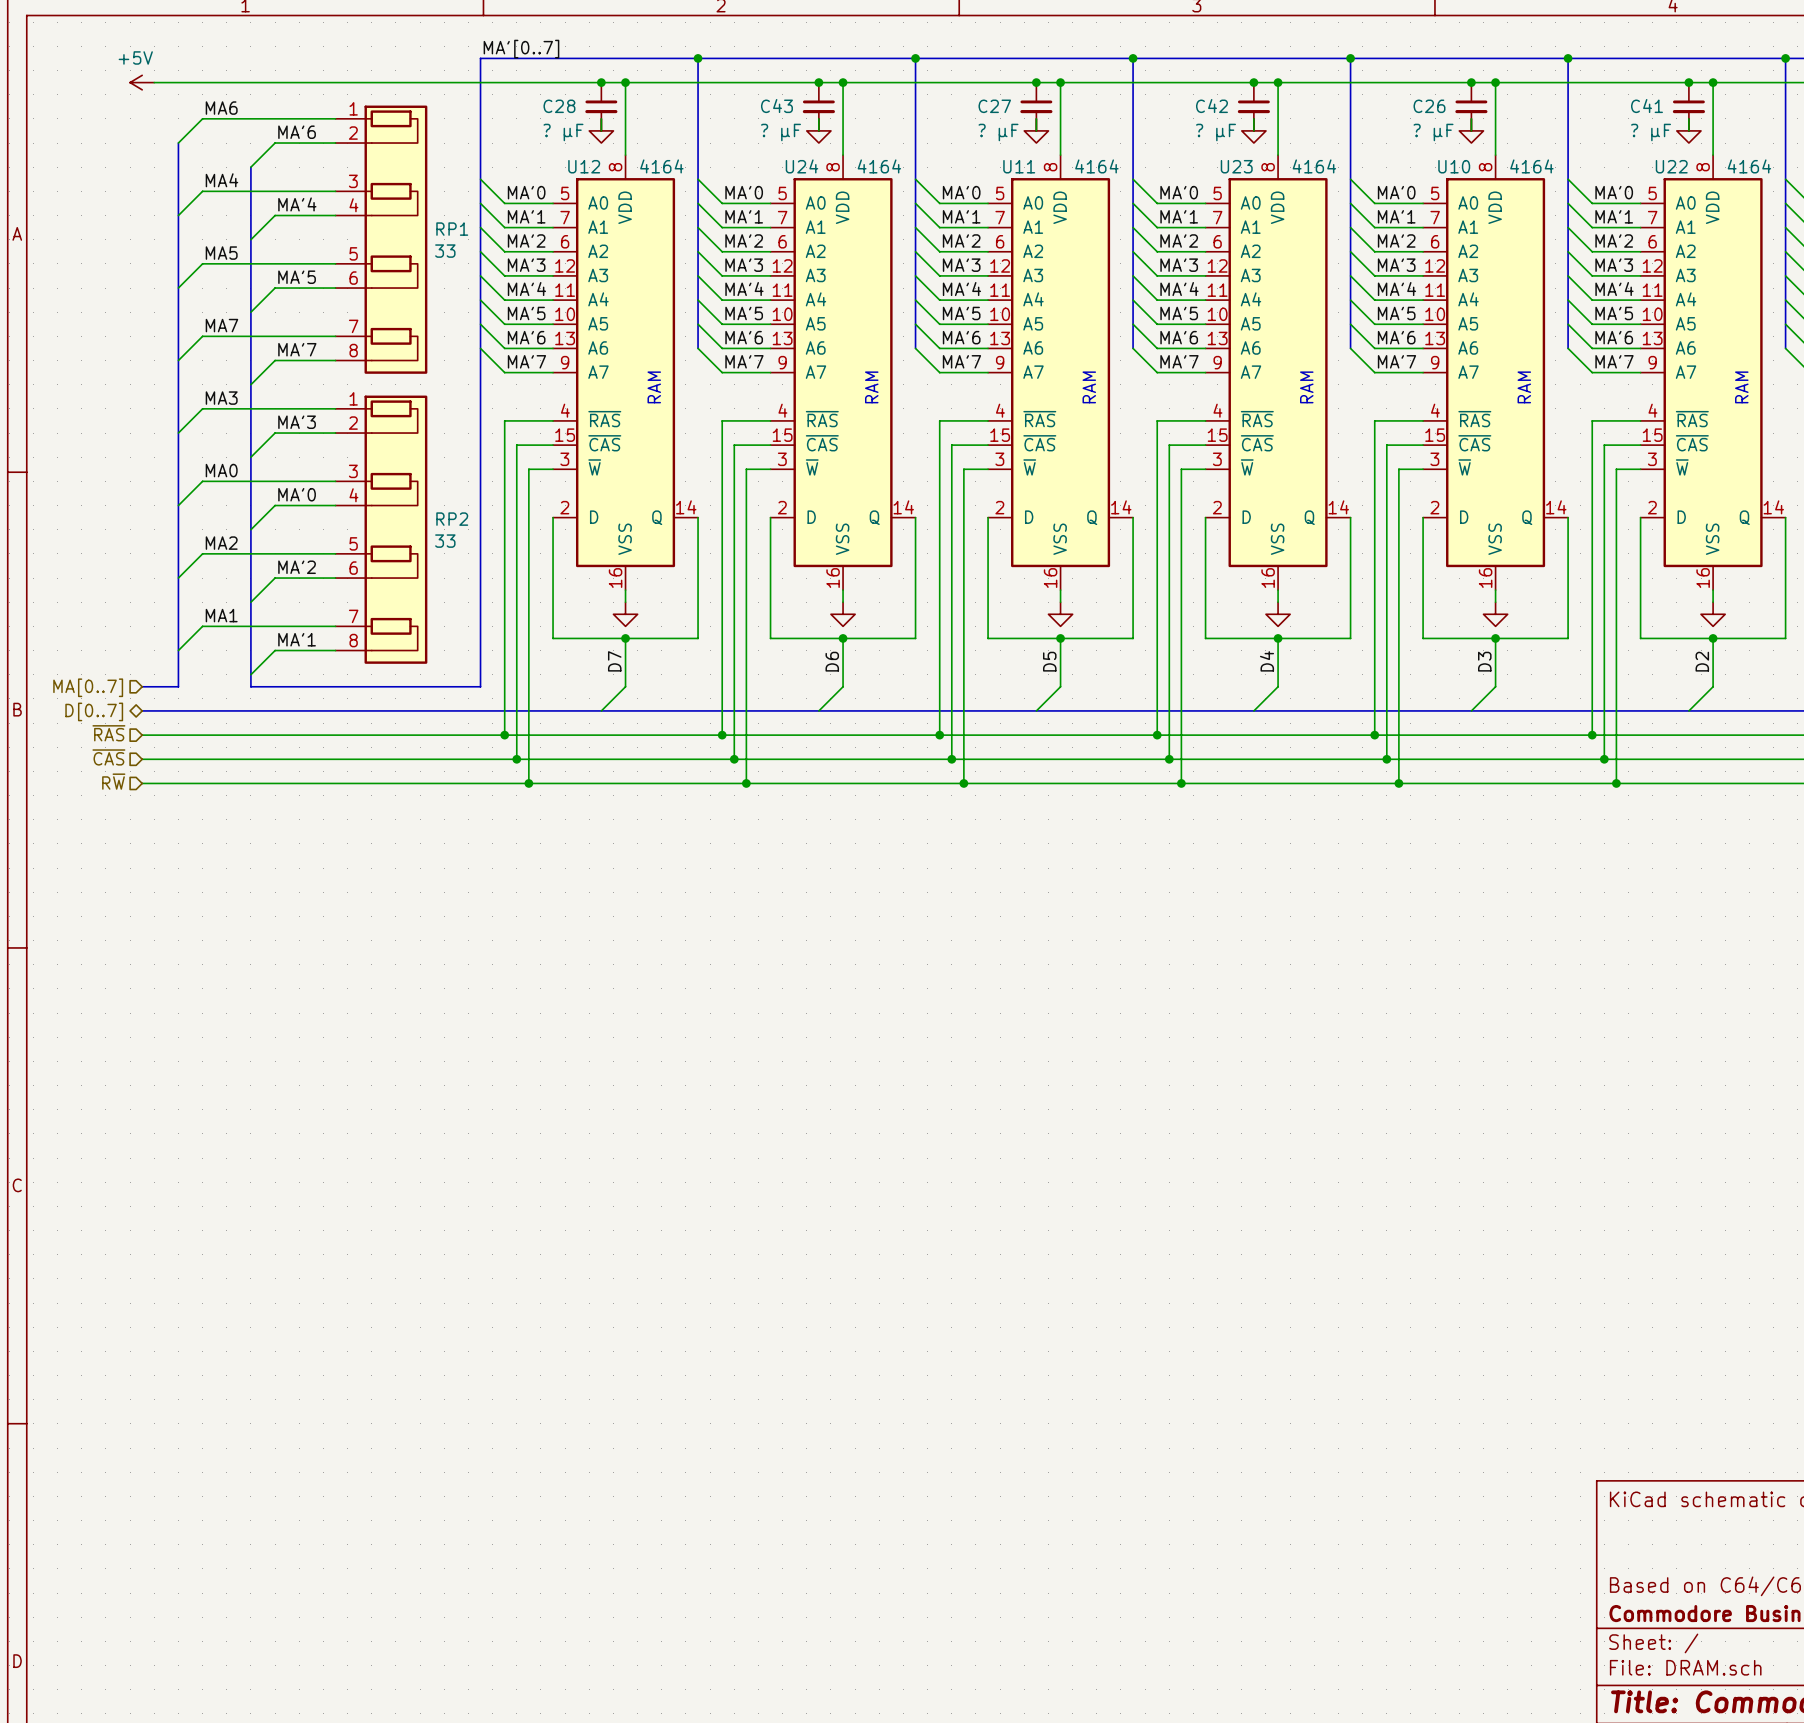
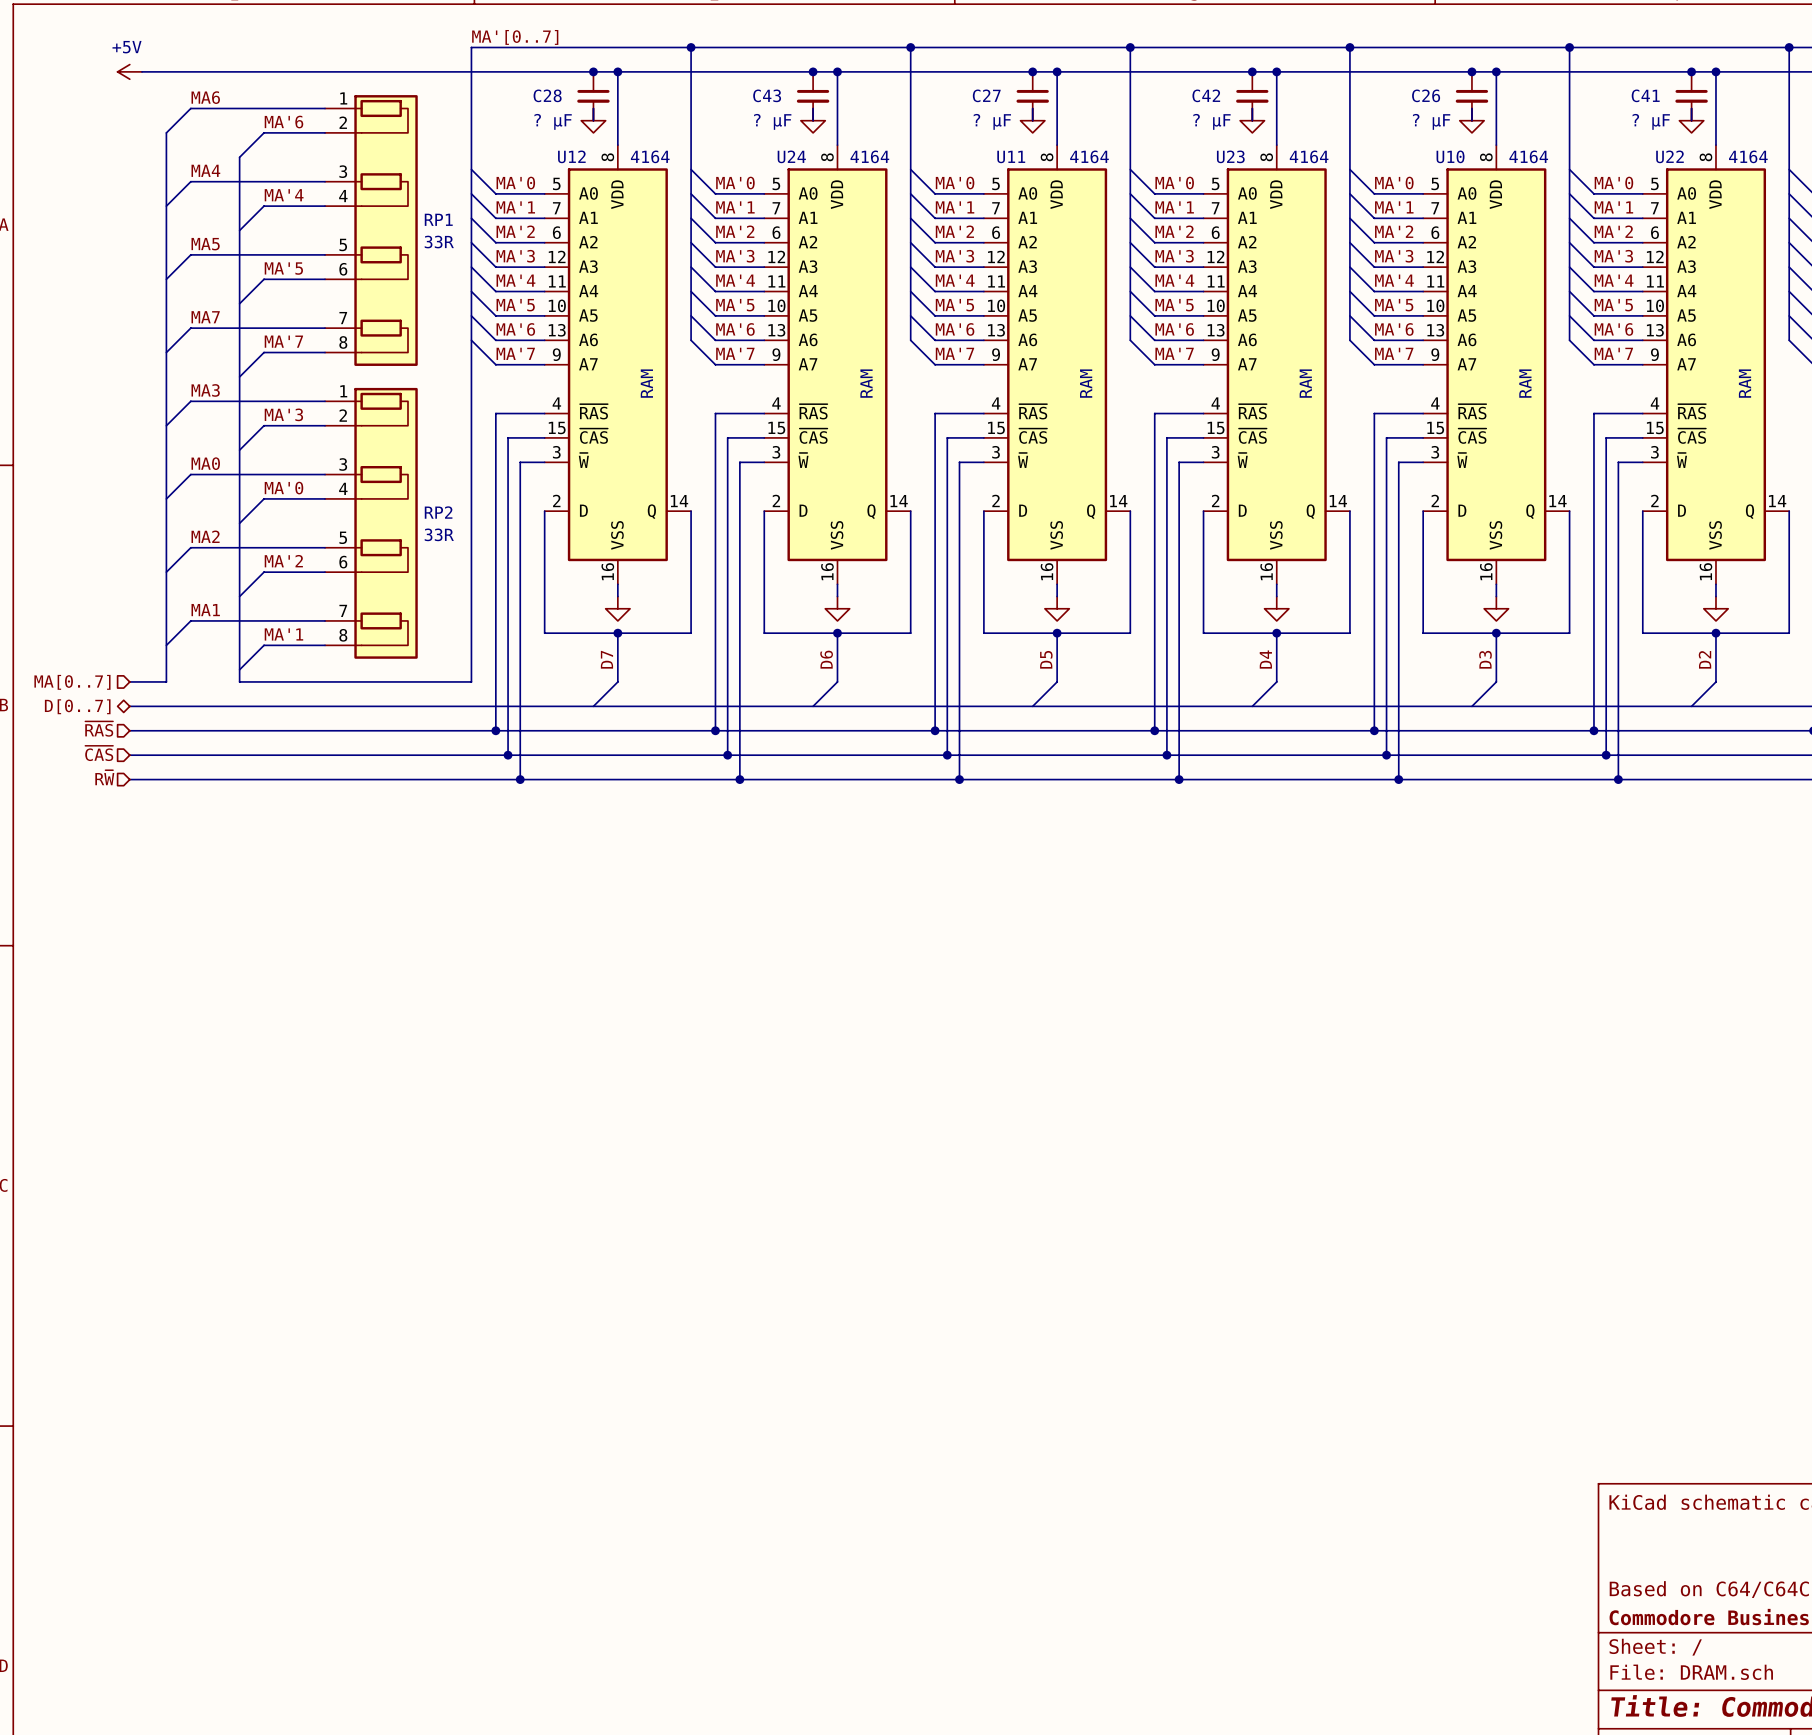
RP1 value: 33 (445, 251) -> 33R (439, 242)
RP2 value: 33 (445, 541) -> 33R (439, 534)

